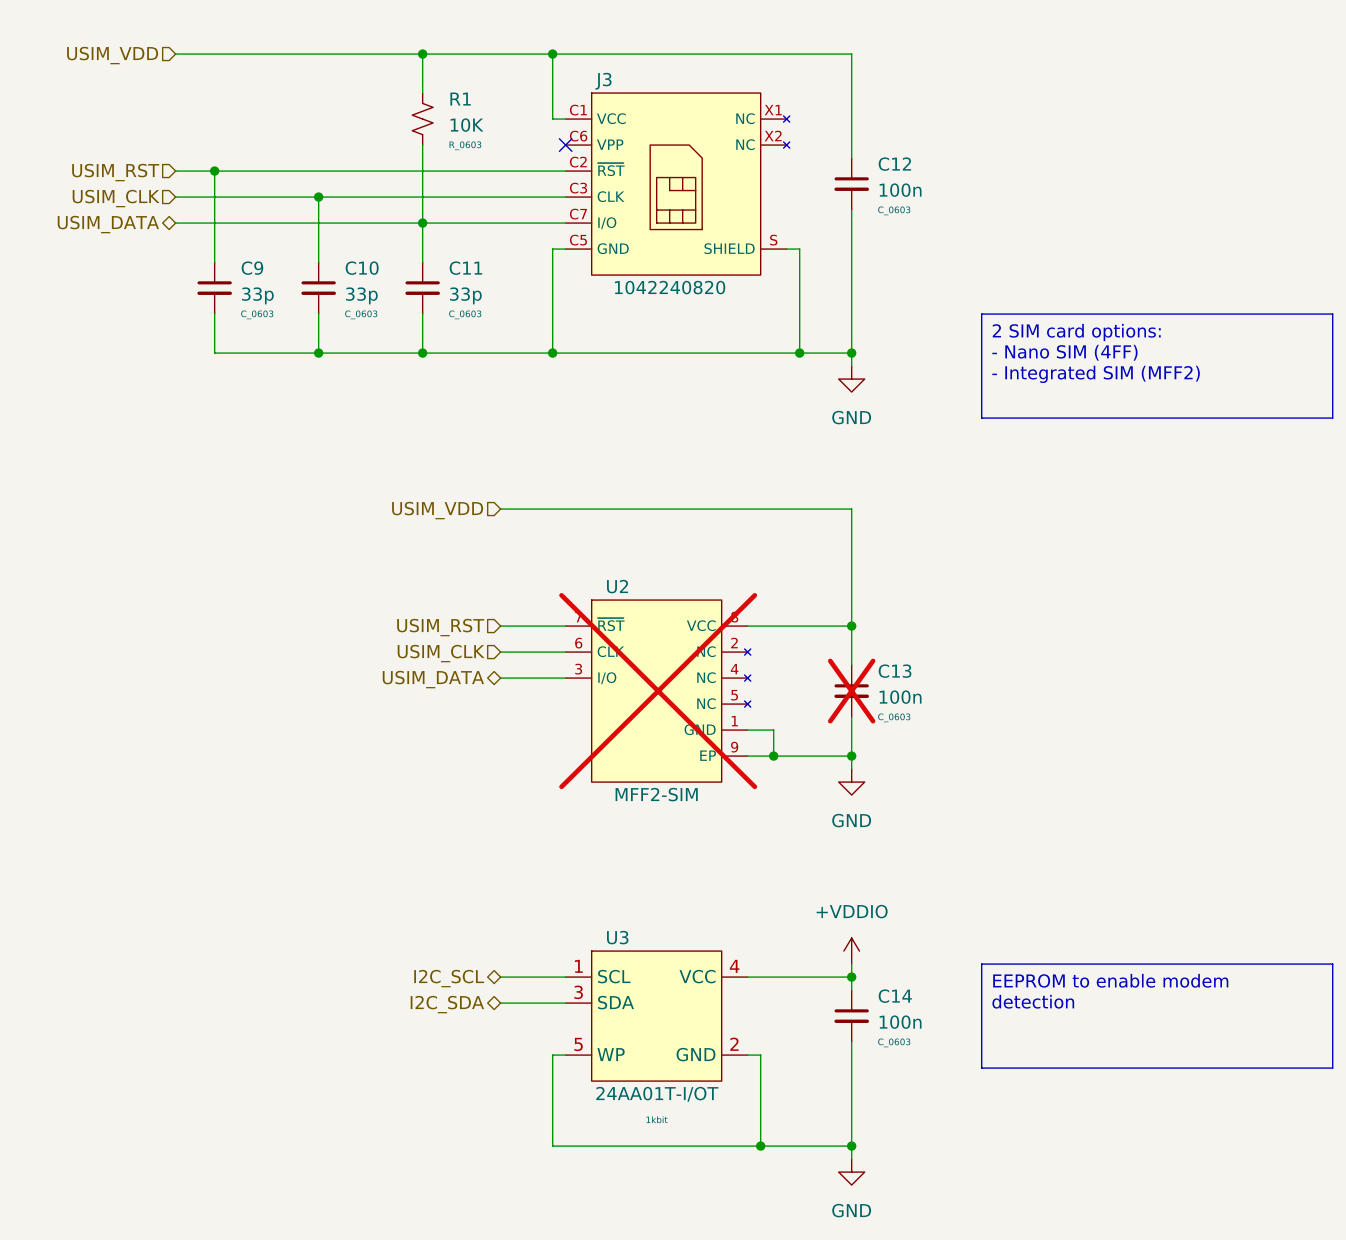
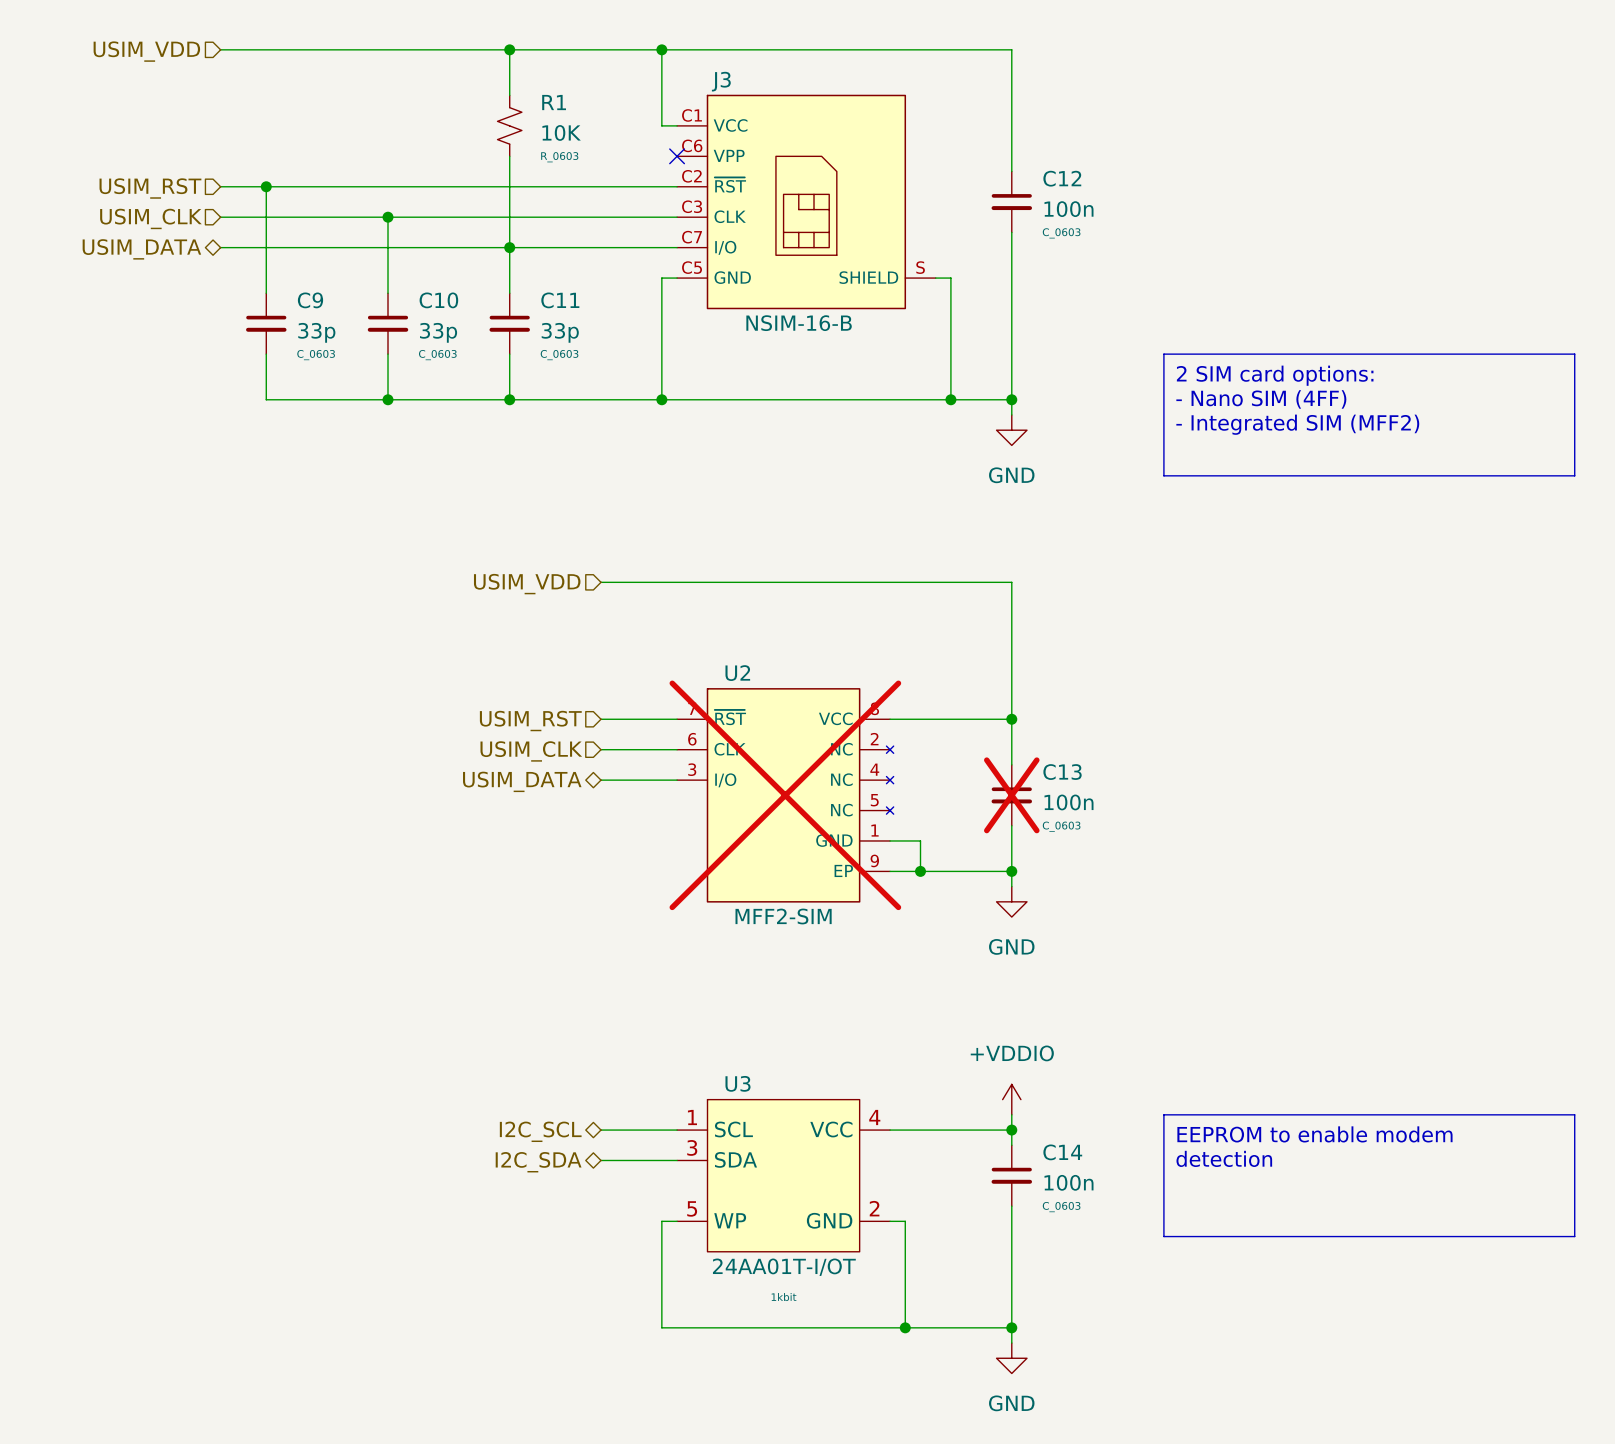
J3 symbol: [565, 92, 790, 276] -> [677, 94, 936, 310]
J3 value: 1042240820 (670, 287) -> NSIM-16-B (799, 323)

